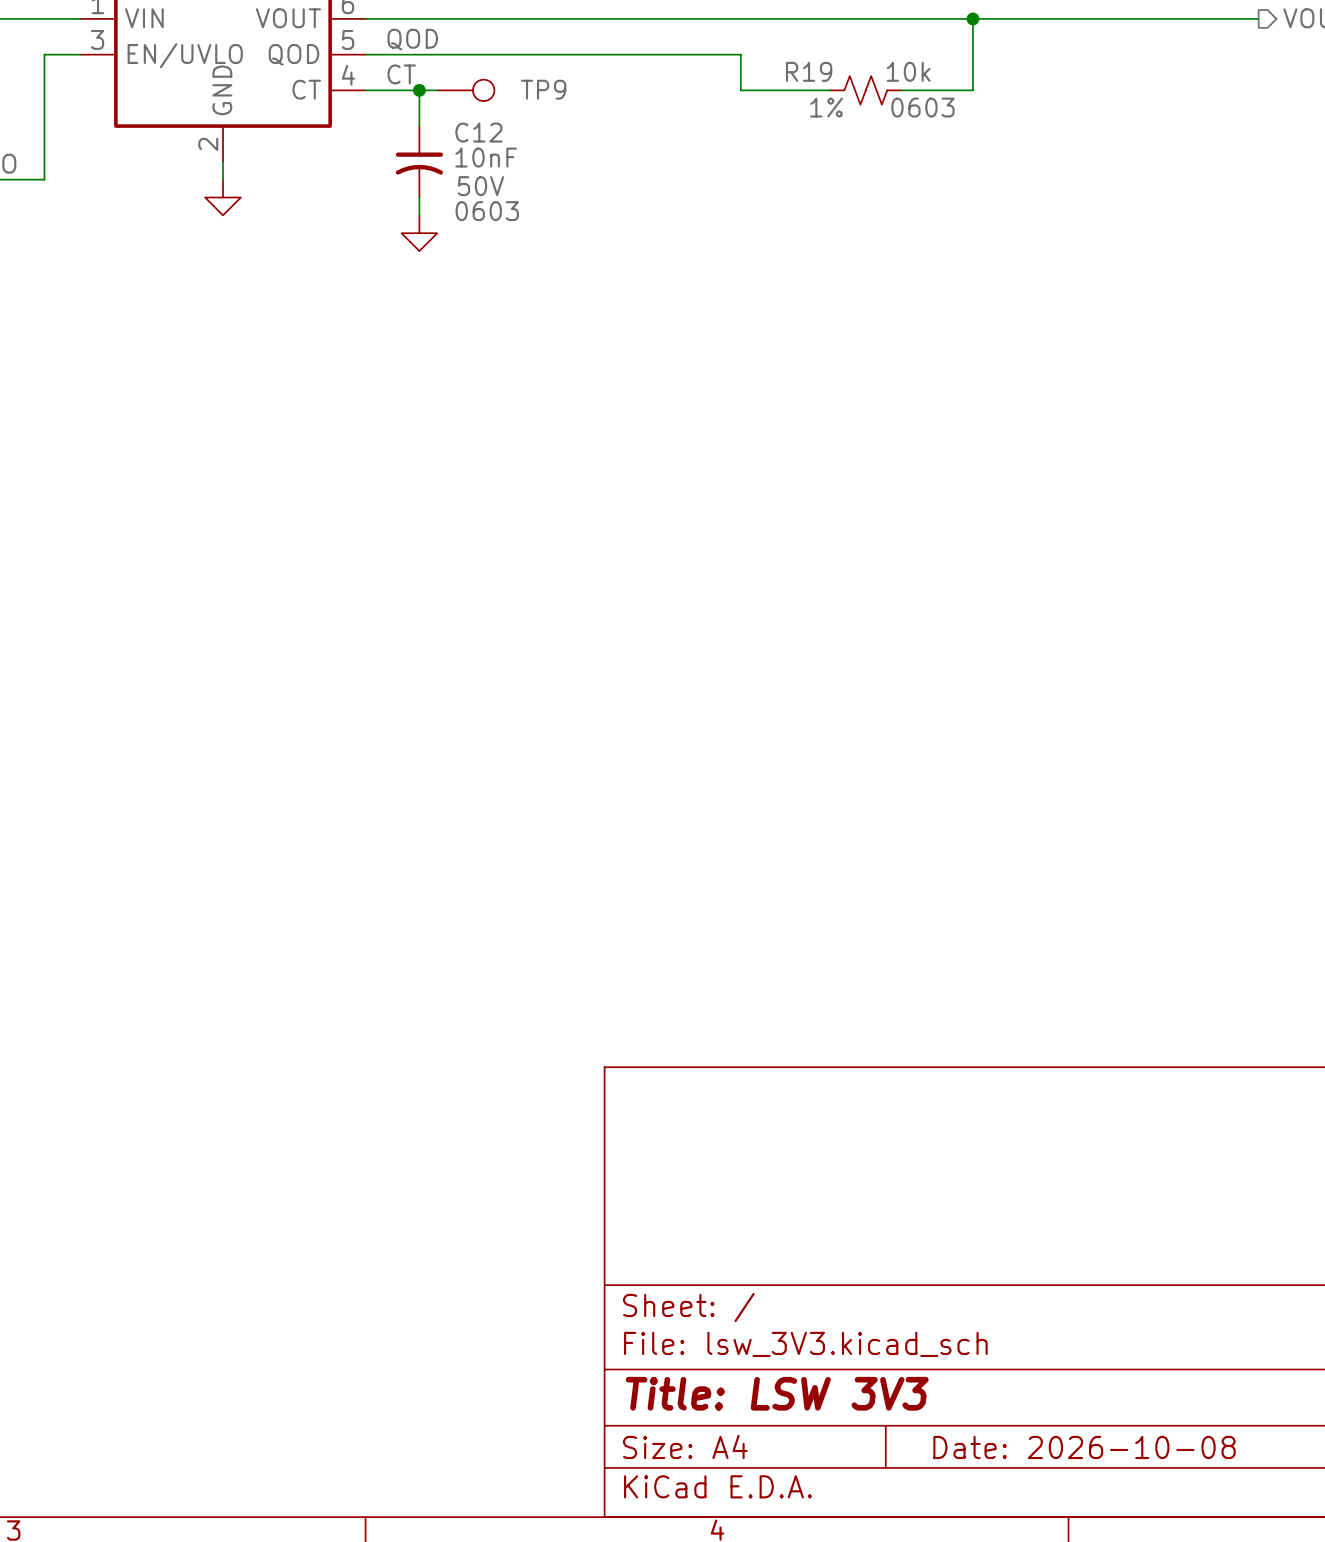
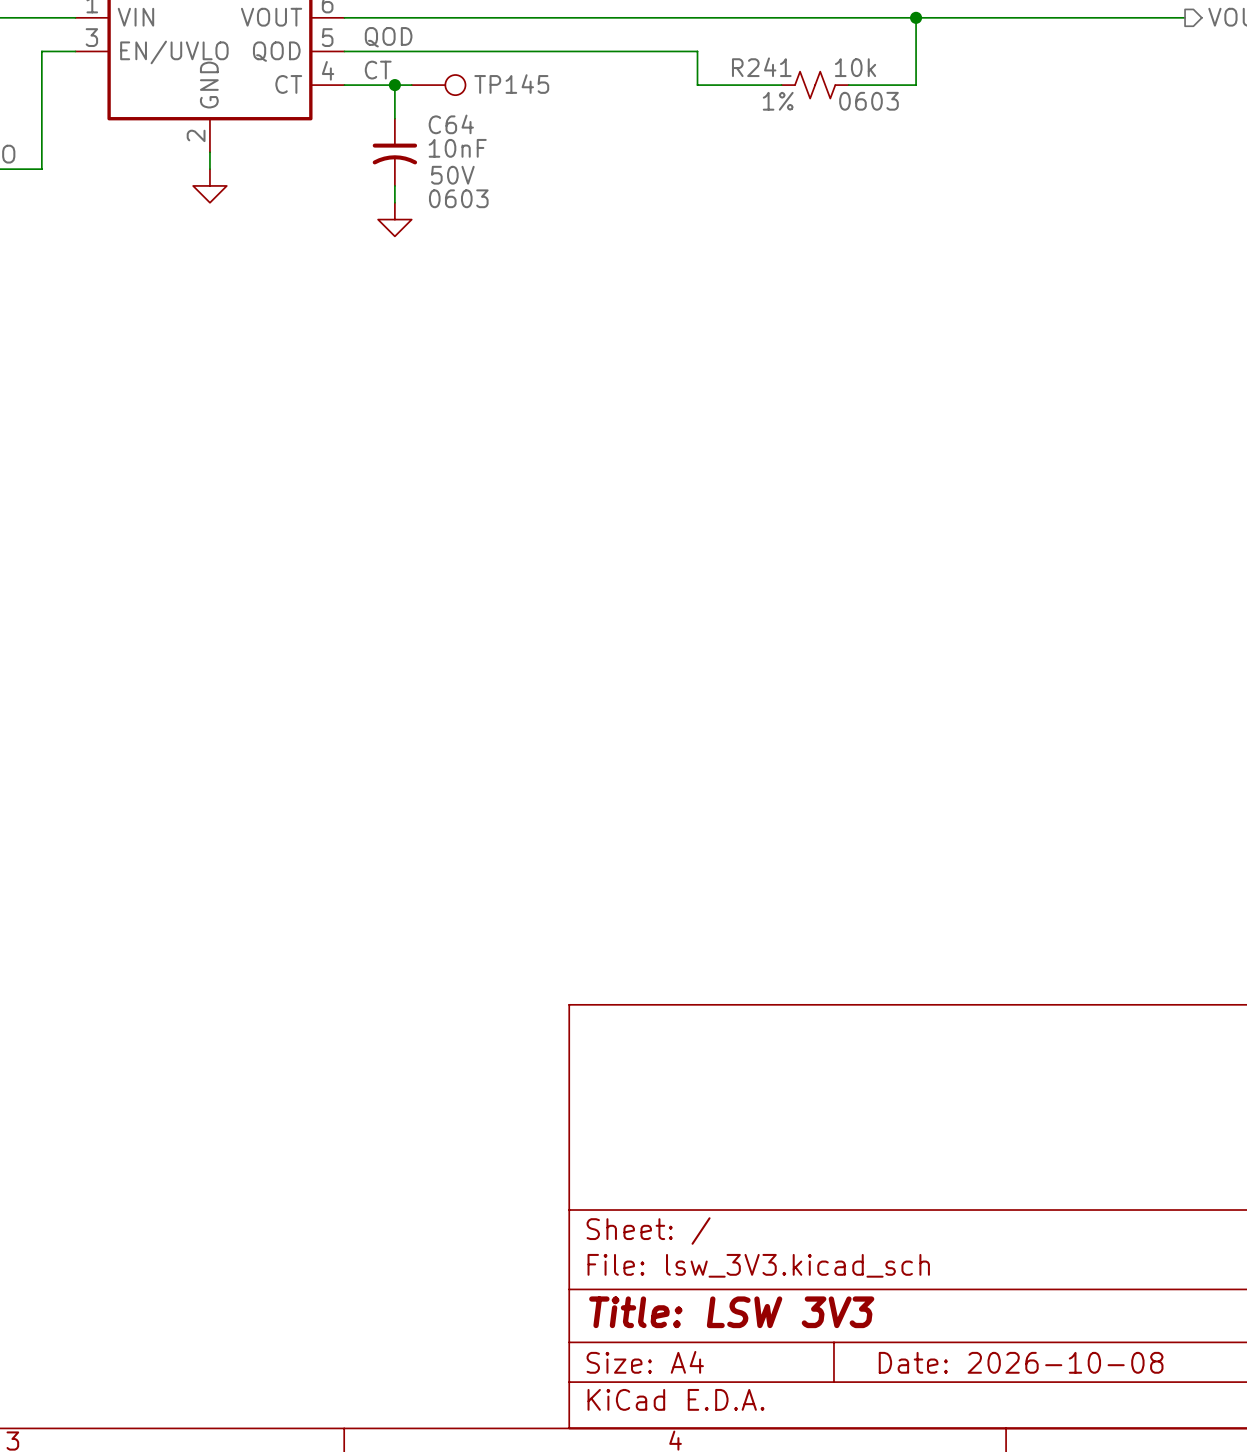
R19 name: R19 (809, 71) -> R241 (761, 67)
TP9 name: TP9 (543, 89) -> TP145 (511, 84)
C12 name: C12 (478, 132) -> C64 (451, 124)

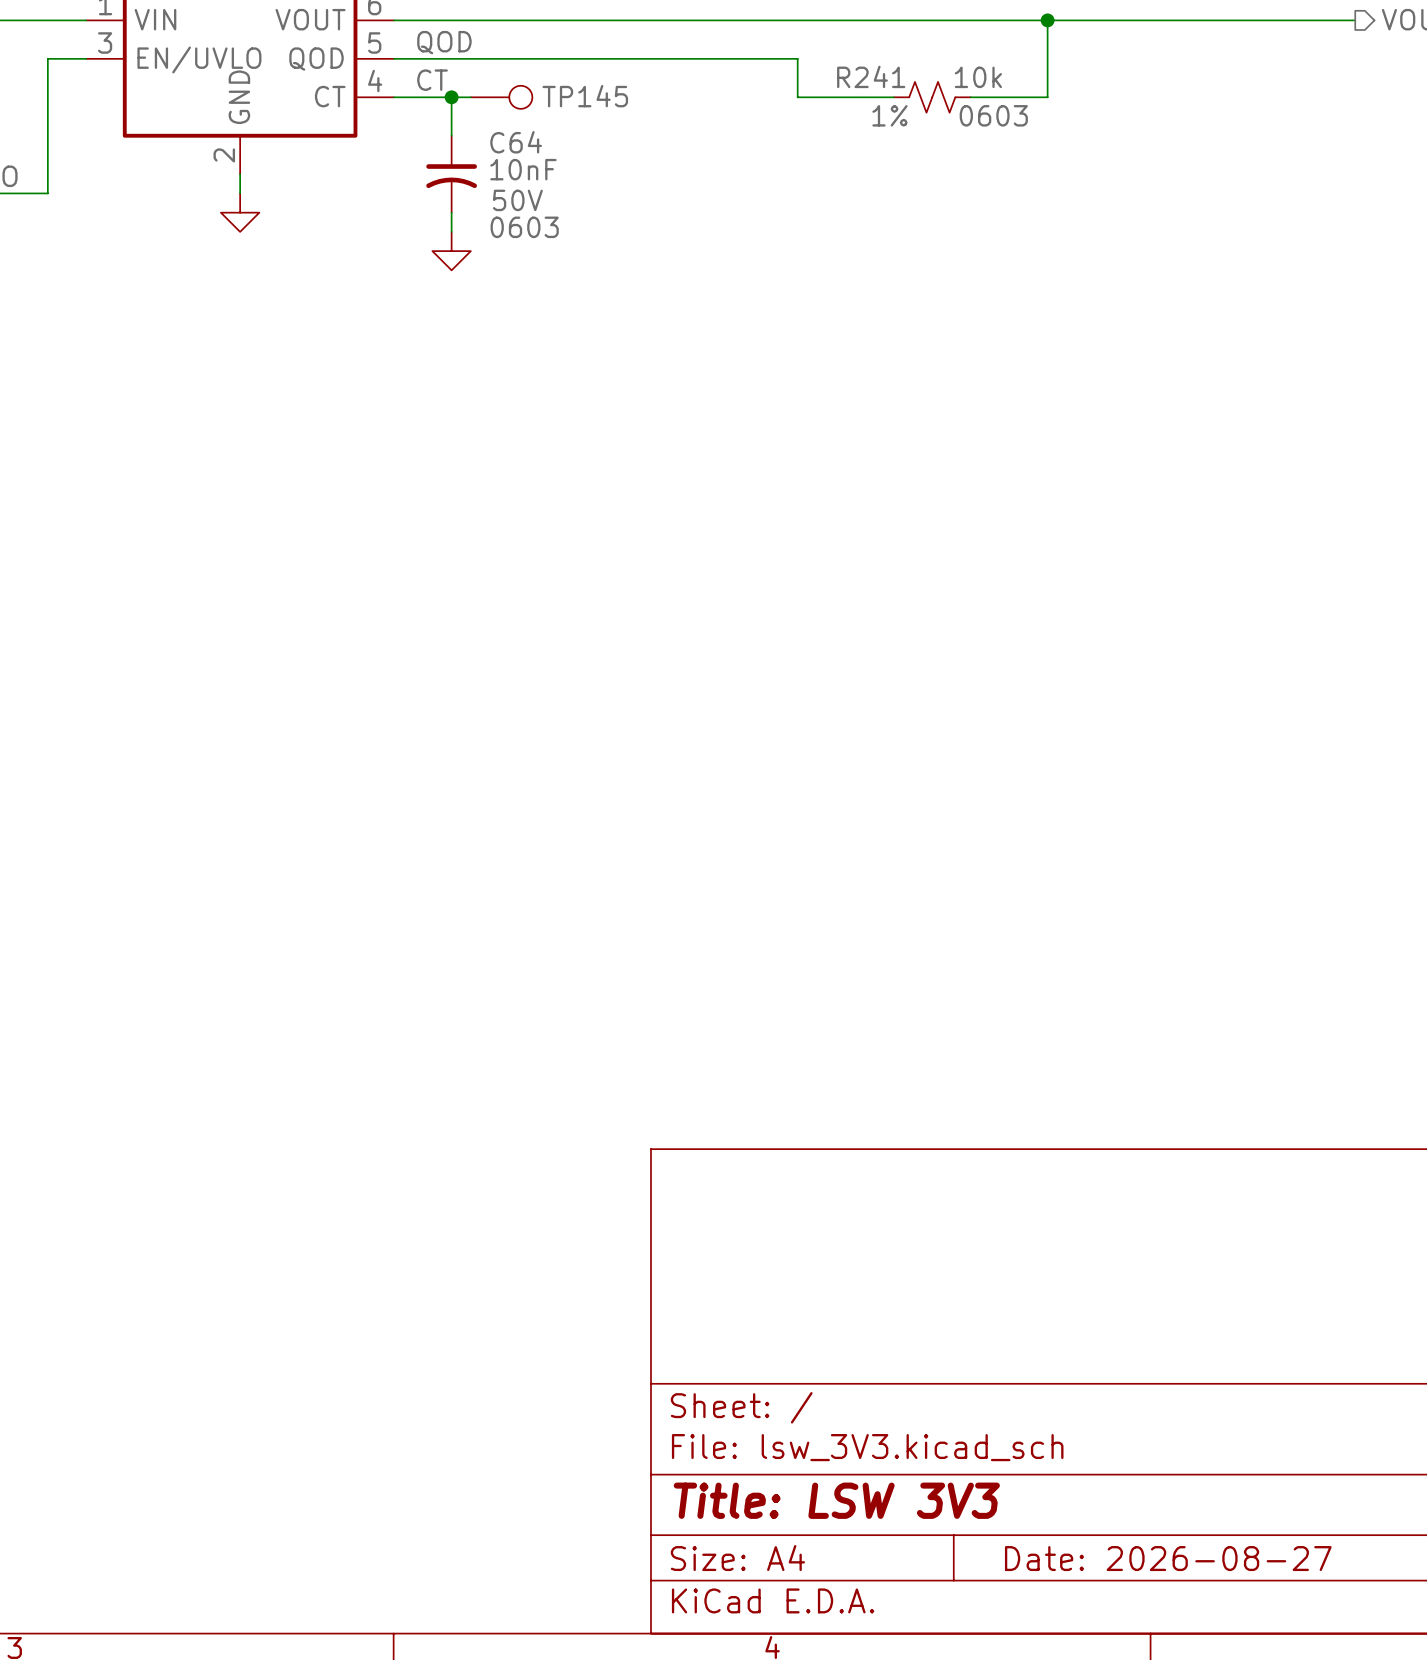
title block: Date: 2026-10-08 (1021, 1362) -> Date: 2026-08-27 (1168, 1558)

